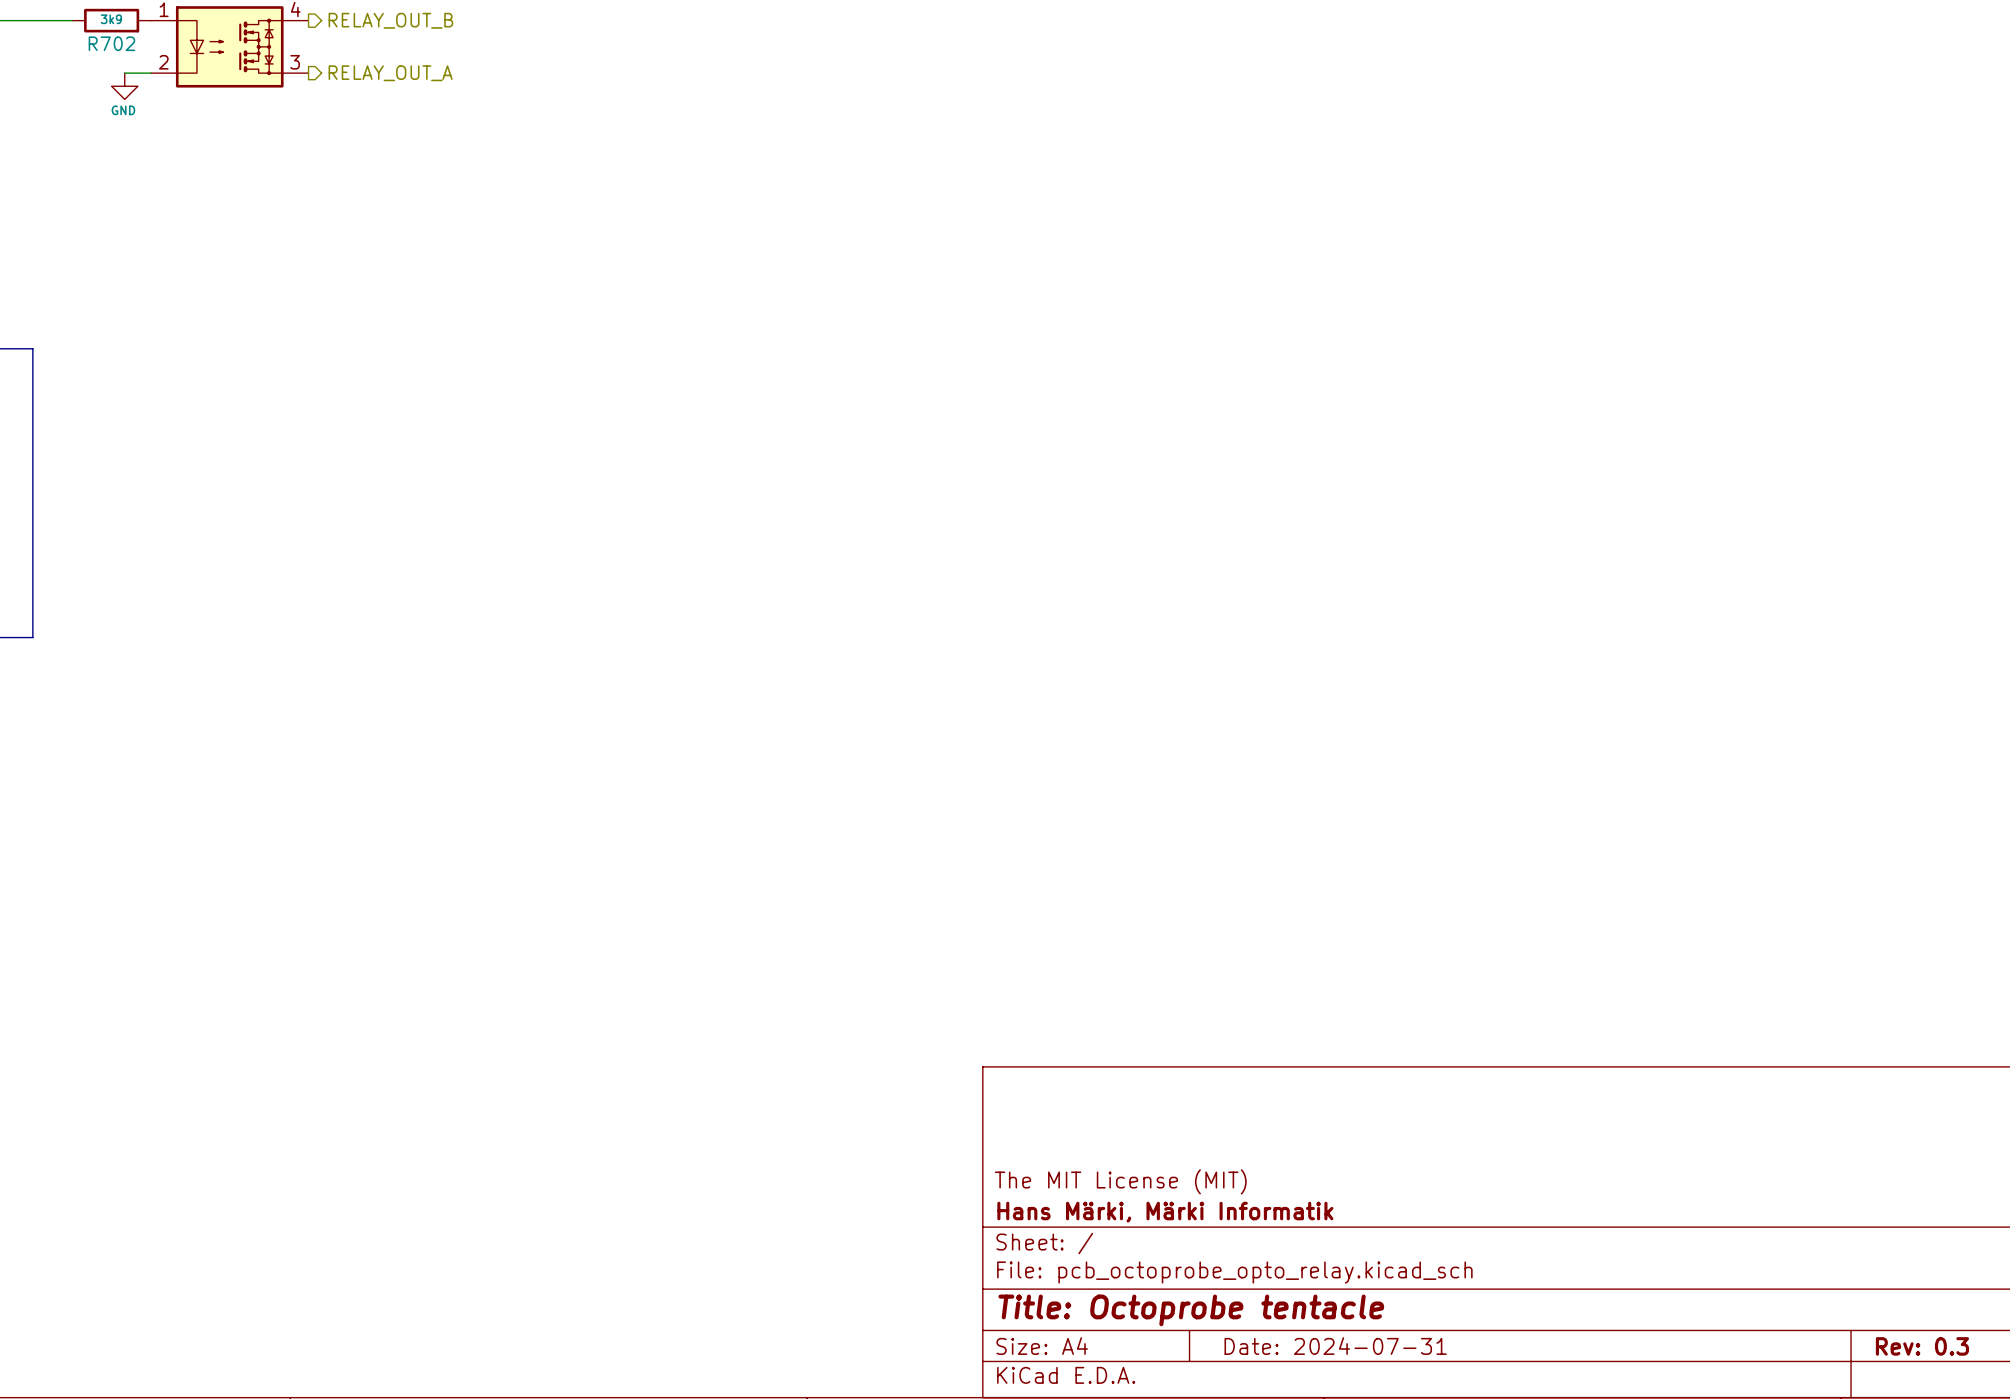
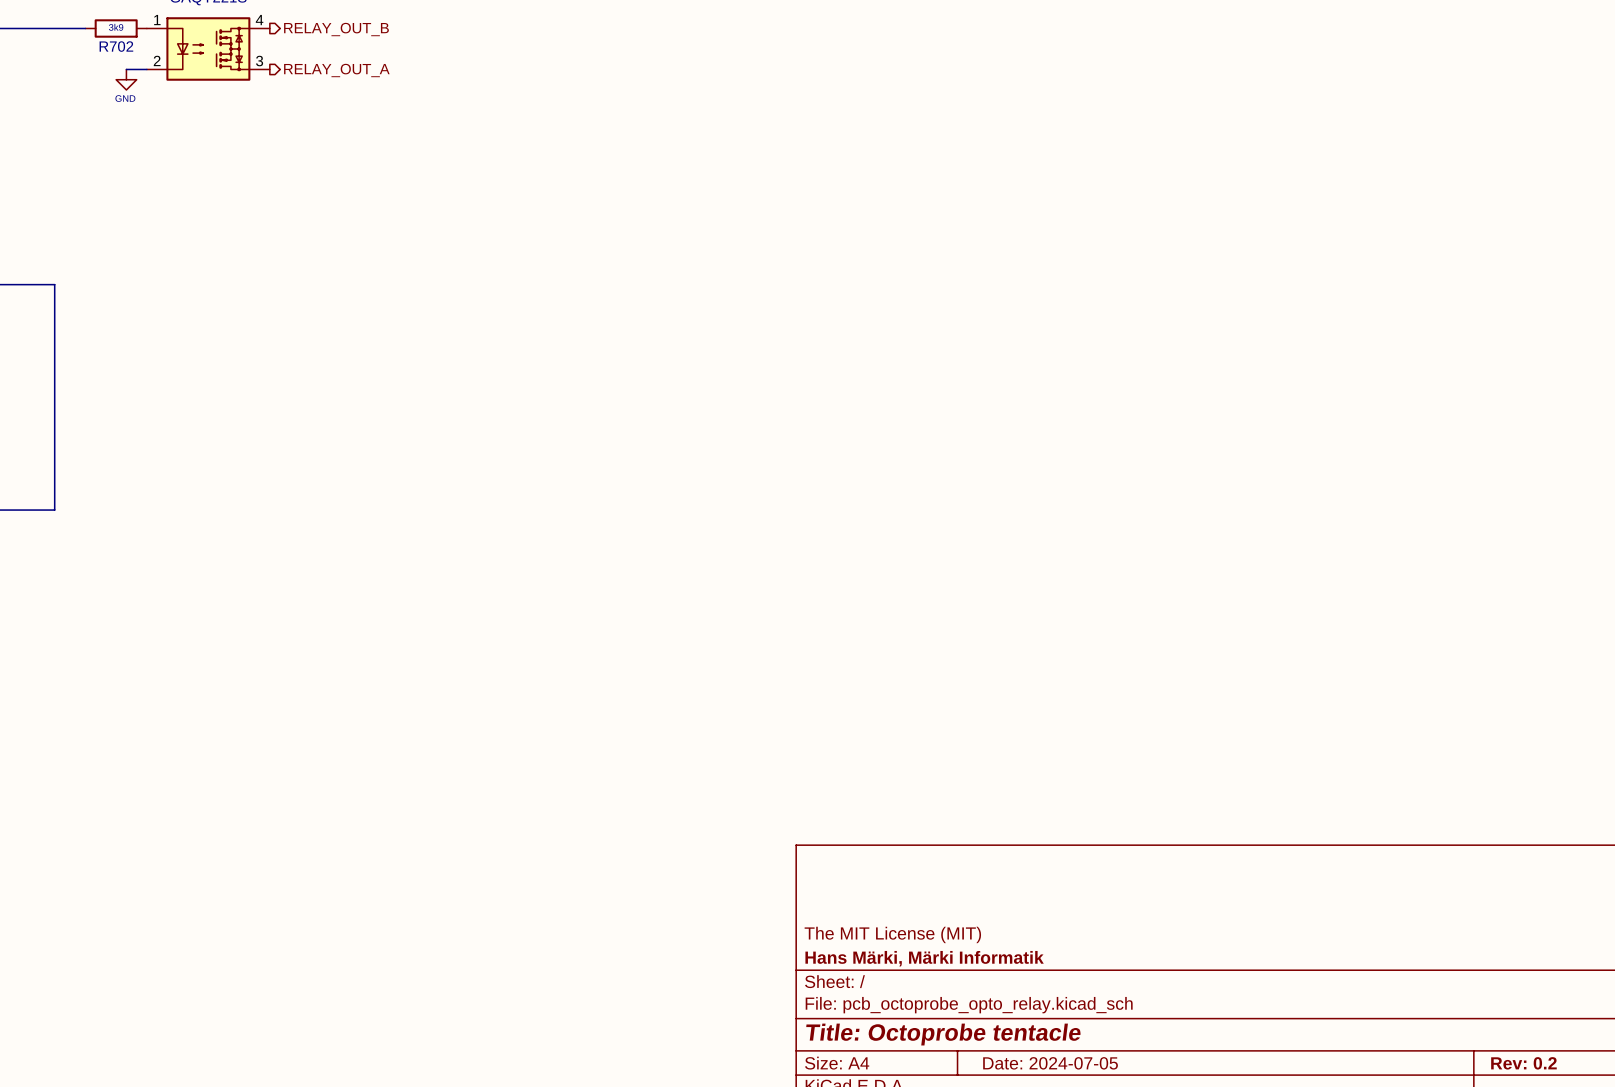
title block: Date: 2024-07-31 (1335, 1346) -> Date: 2024-07-05 (1050, 1063)
title block: Rev: 0.3 (1922, 1346) -> Rev: 0.2 (1523, 1063)

